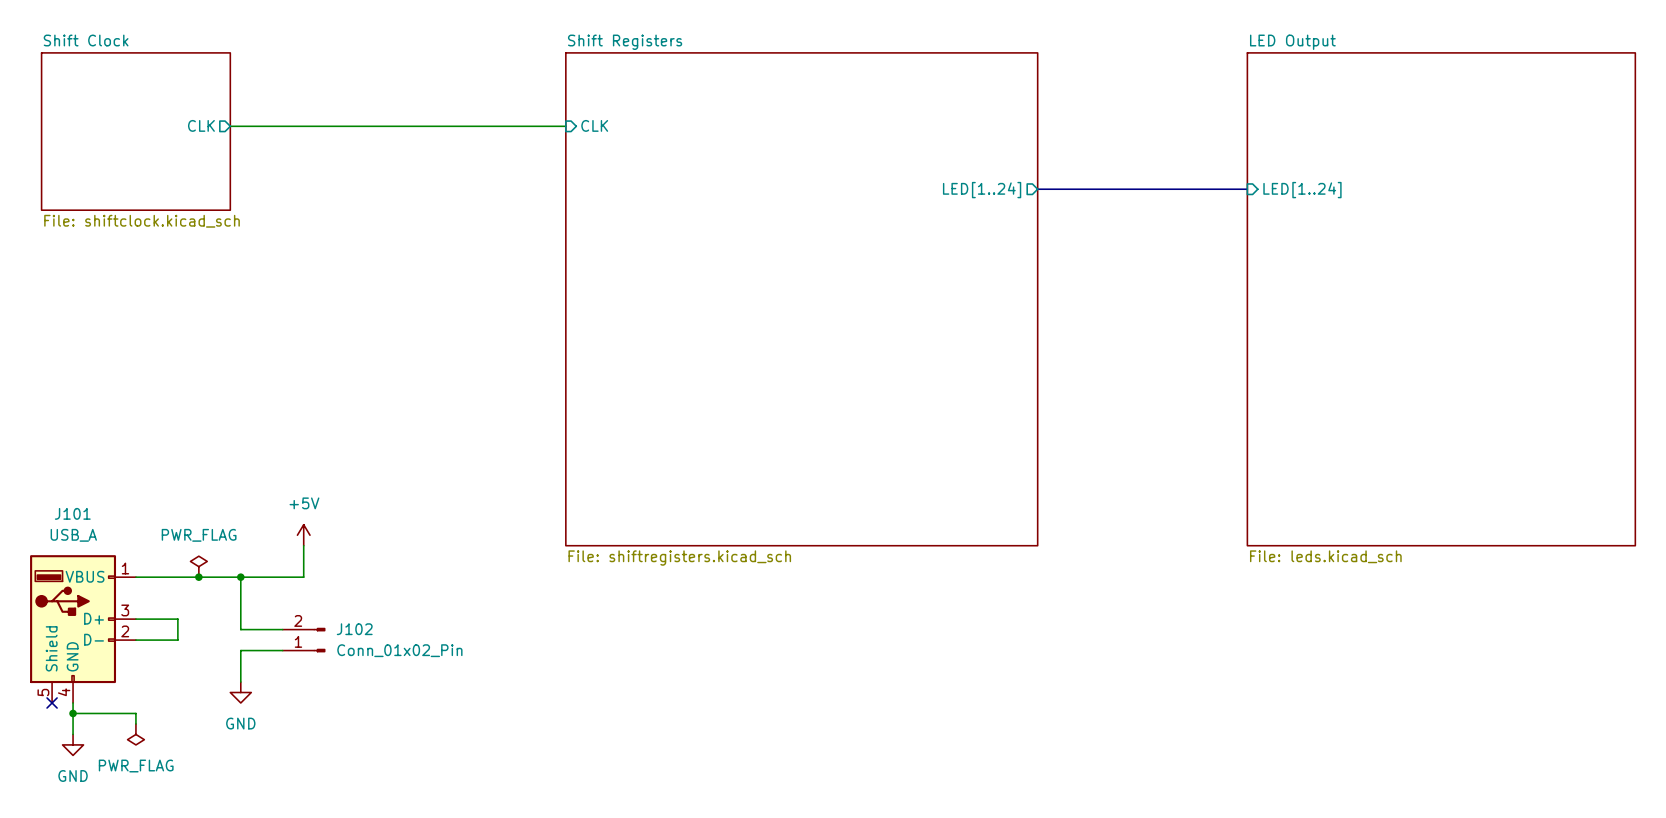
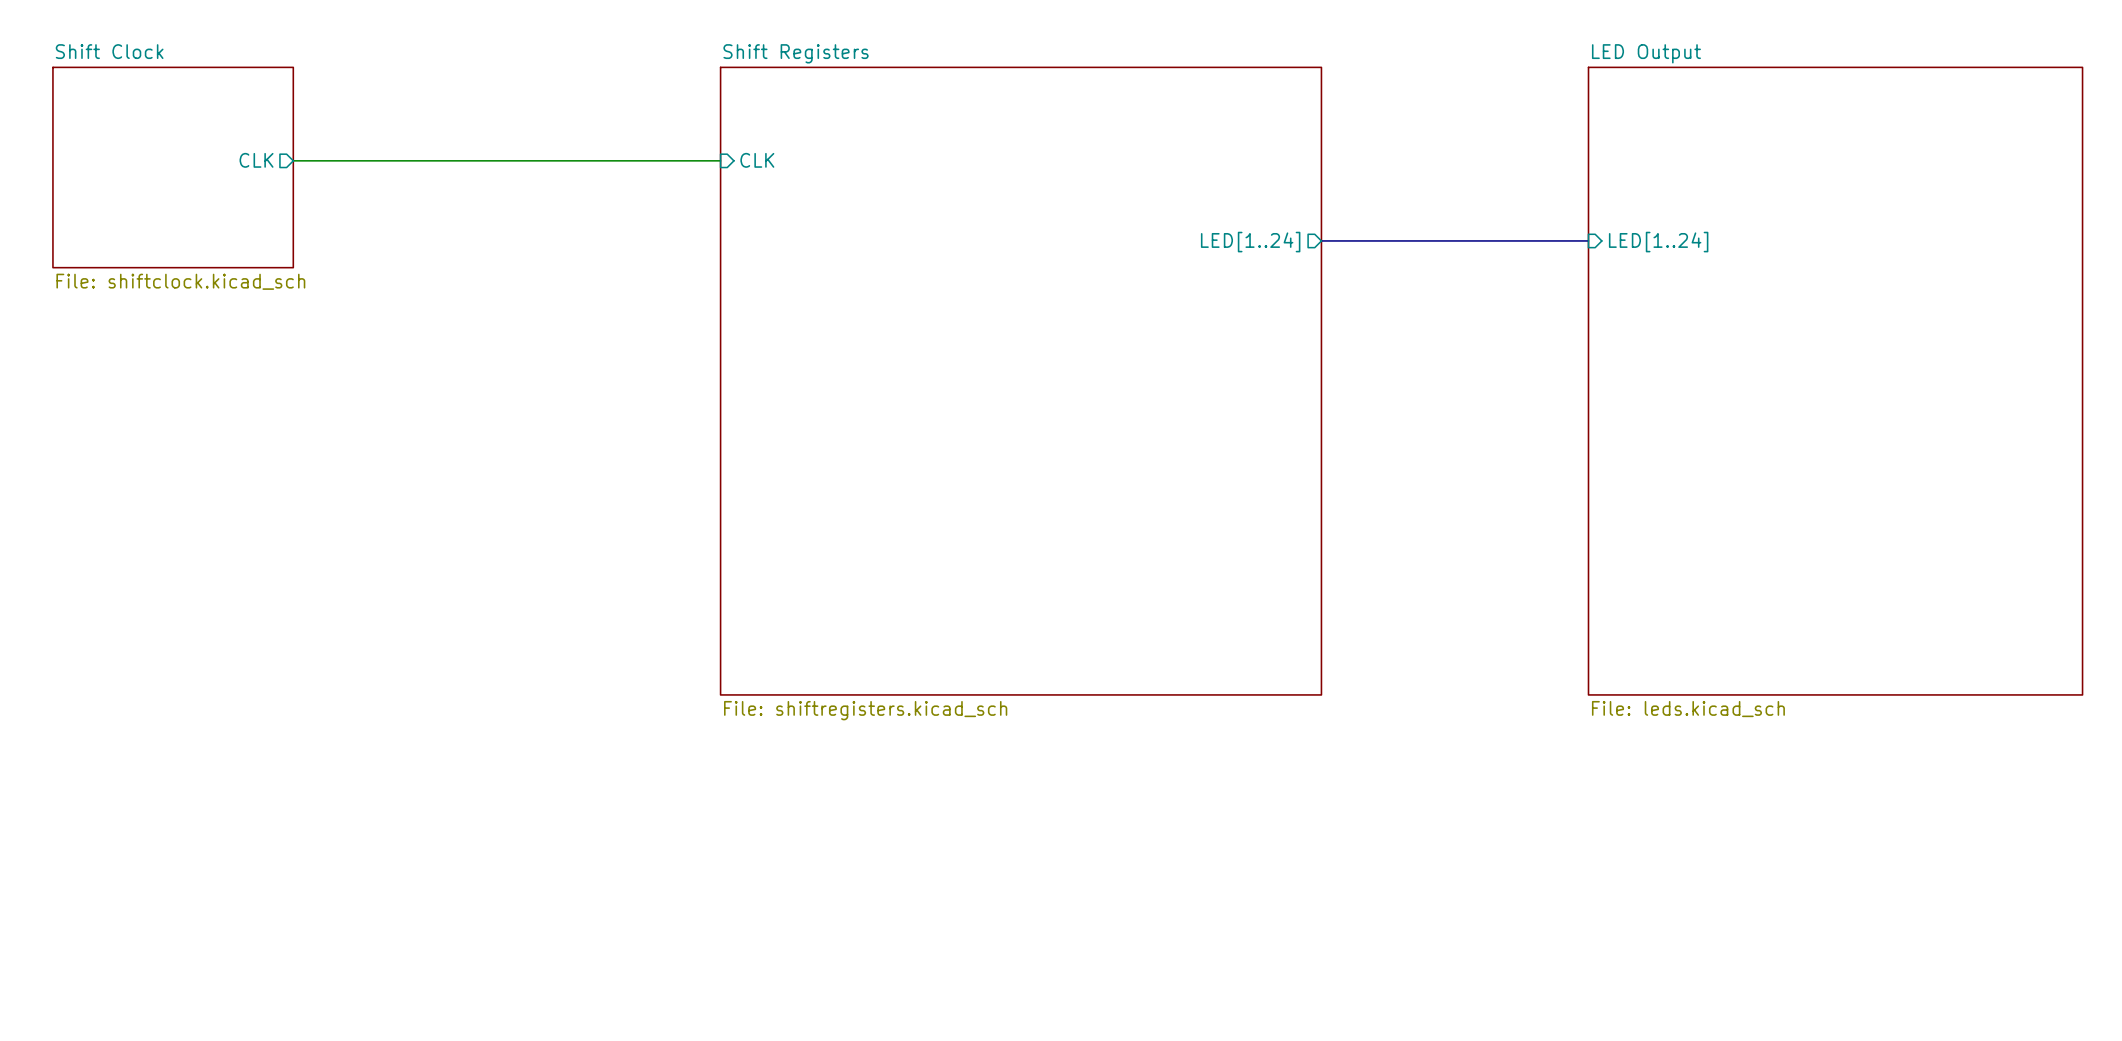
power symbol: +5V (303, 535) -> none
wire: (303, 545) (303, 577) (135, 577) -> none
power symbol: PWR_FLAG (198, 566) -> none
junction: (198, 577) -> none
wire: (240, 577) (240, 629) (282, 629) -> none
junction: (240, 577) -> none
wire: (135, 619) (177, 619) (177, 640) (135, 640) -> none
J101: USB_A (83, 629) -> none
J102: Conn_01x02_Pin (304, 640) -> none
wire: (282, 650) (240, 650) (240, 682) -> none
power symbol: GND (240, 692) -> none
no-connect mark: (52, 702) -> none
wire: (73, 702) (73, 734) -> none
wire: (73, 713) (135, 713) (135, 723) -> none
junction: (73, 713) -> none
power symbol: PWR_FLAG (135, 734) -> none
power symbol: GND (73, 744) -> none

